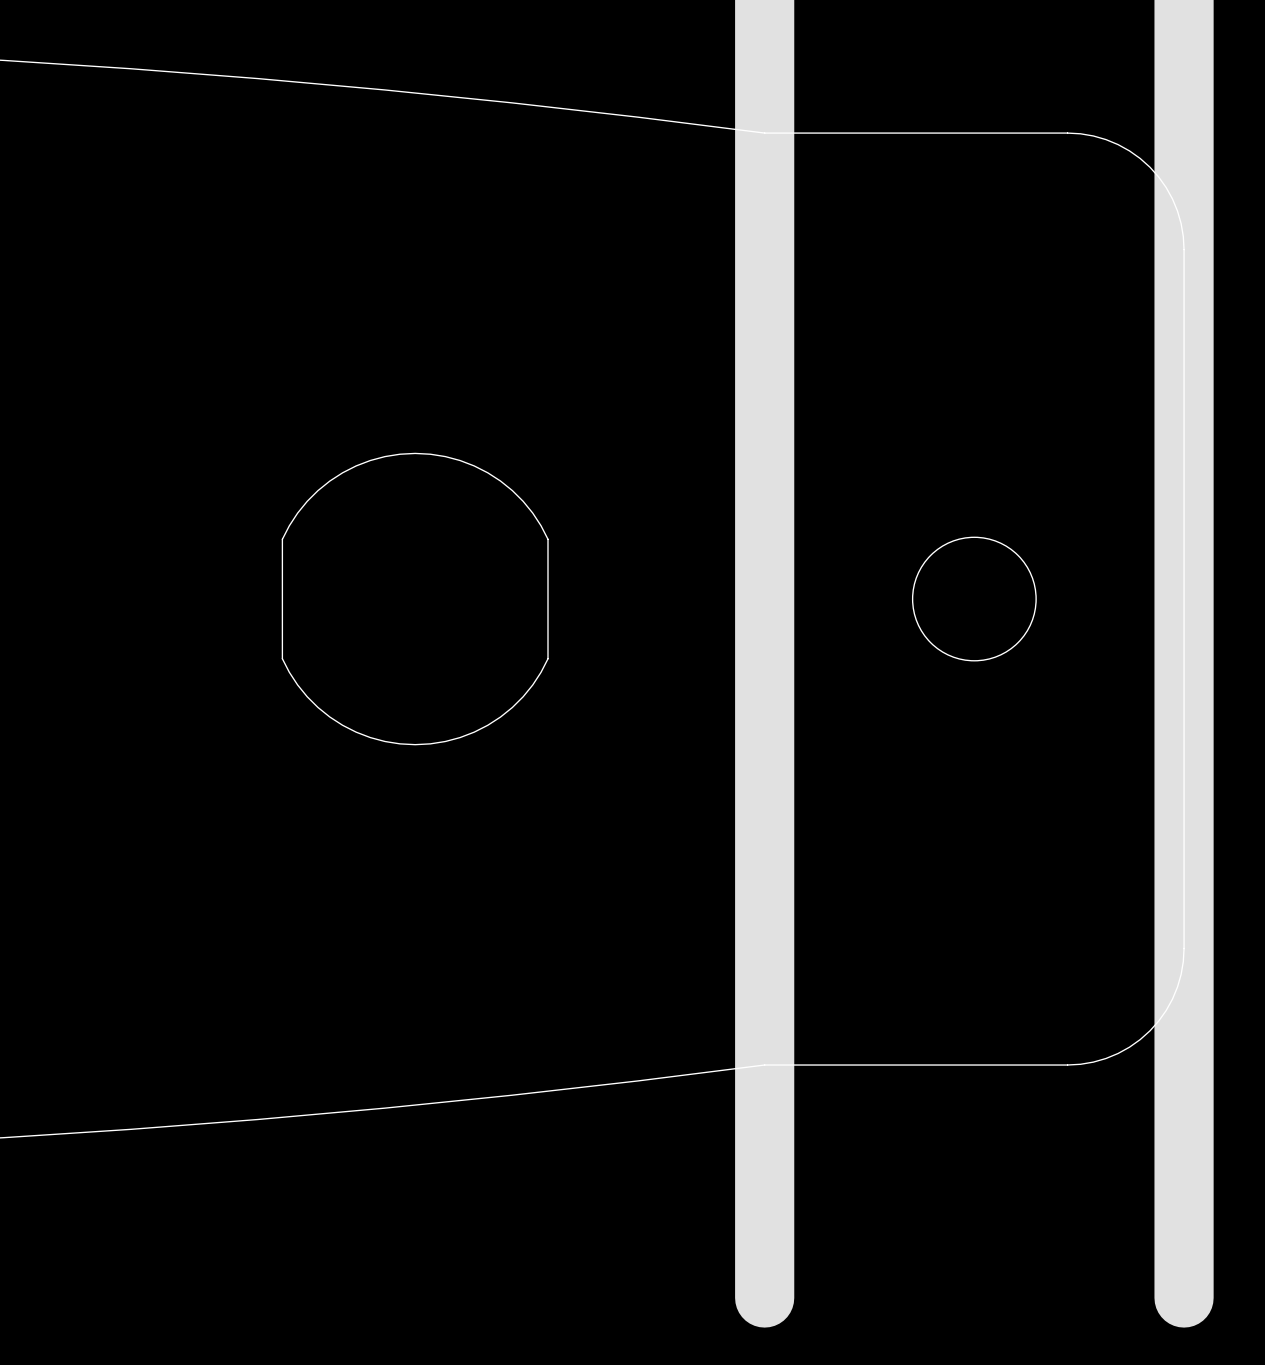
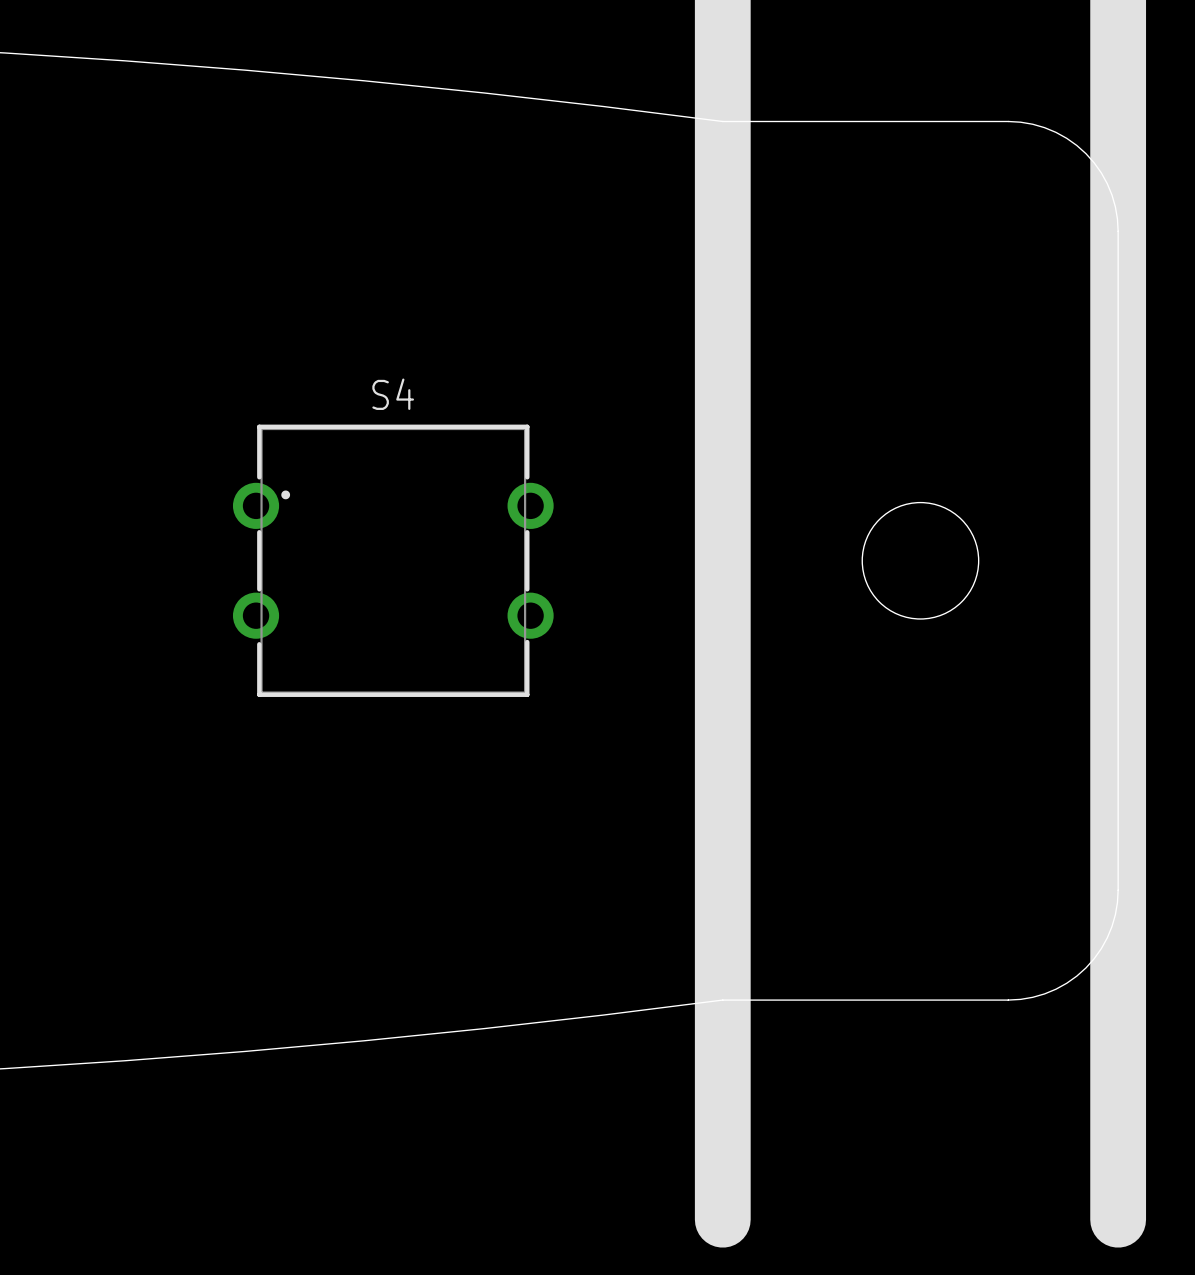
board edge: (282, 539) (282, 658) (297, 685) (318, 707) (342, 725) (356, 732) (385, 741) (415, 744) (445, 741) (474, 732) (487, 725) (512, 707) (532, 685) (547, 658) (547, 539) (532, 513) (512, 490) (487, 472) (474, 465) (445, 456) (415, 453) (385, 456) (356, 465) (342, 472) (318, 490) (297, 513) (282, 539) -> none
S4: none -> (393, 560)

